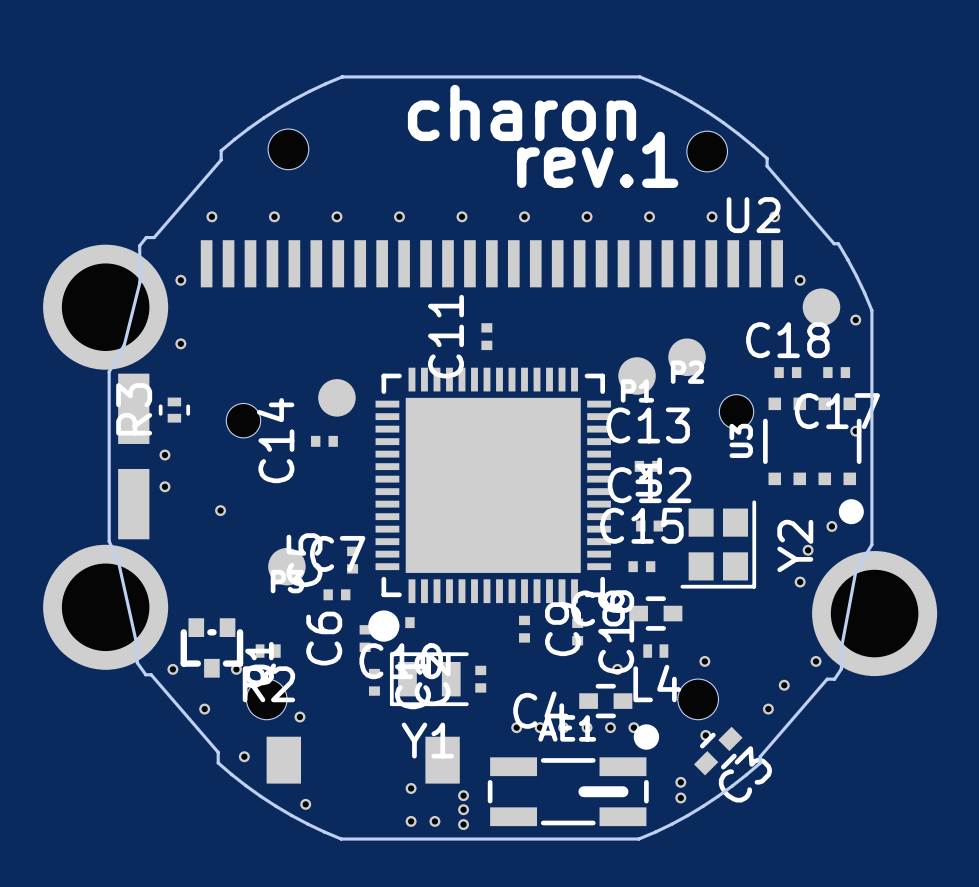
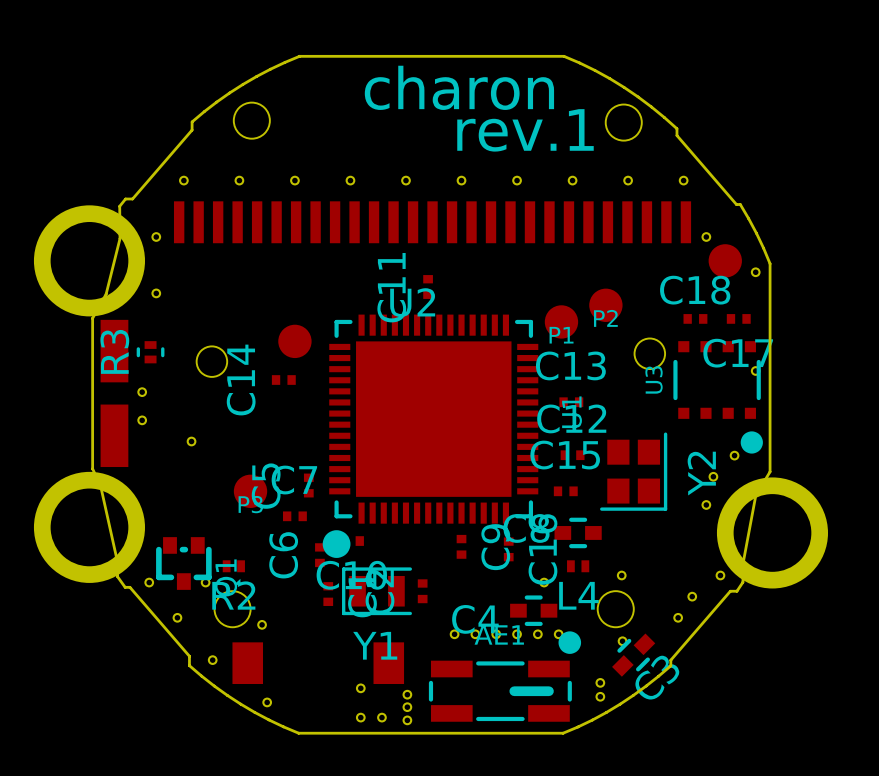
U2 name position: U2 (753, 215) -> U2 (412, 302)

